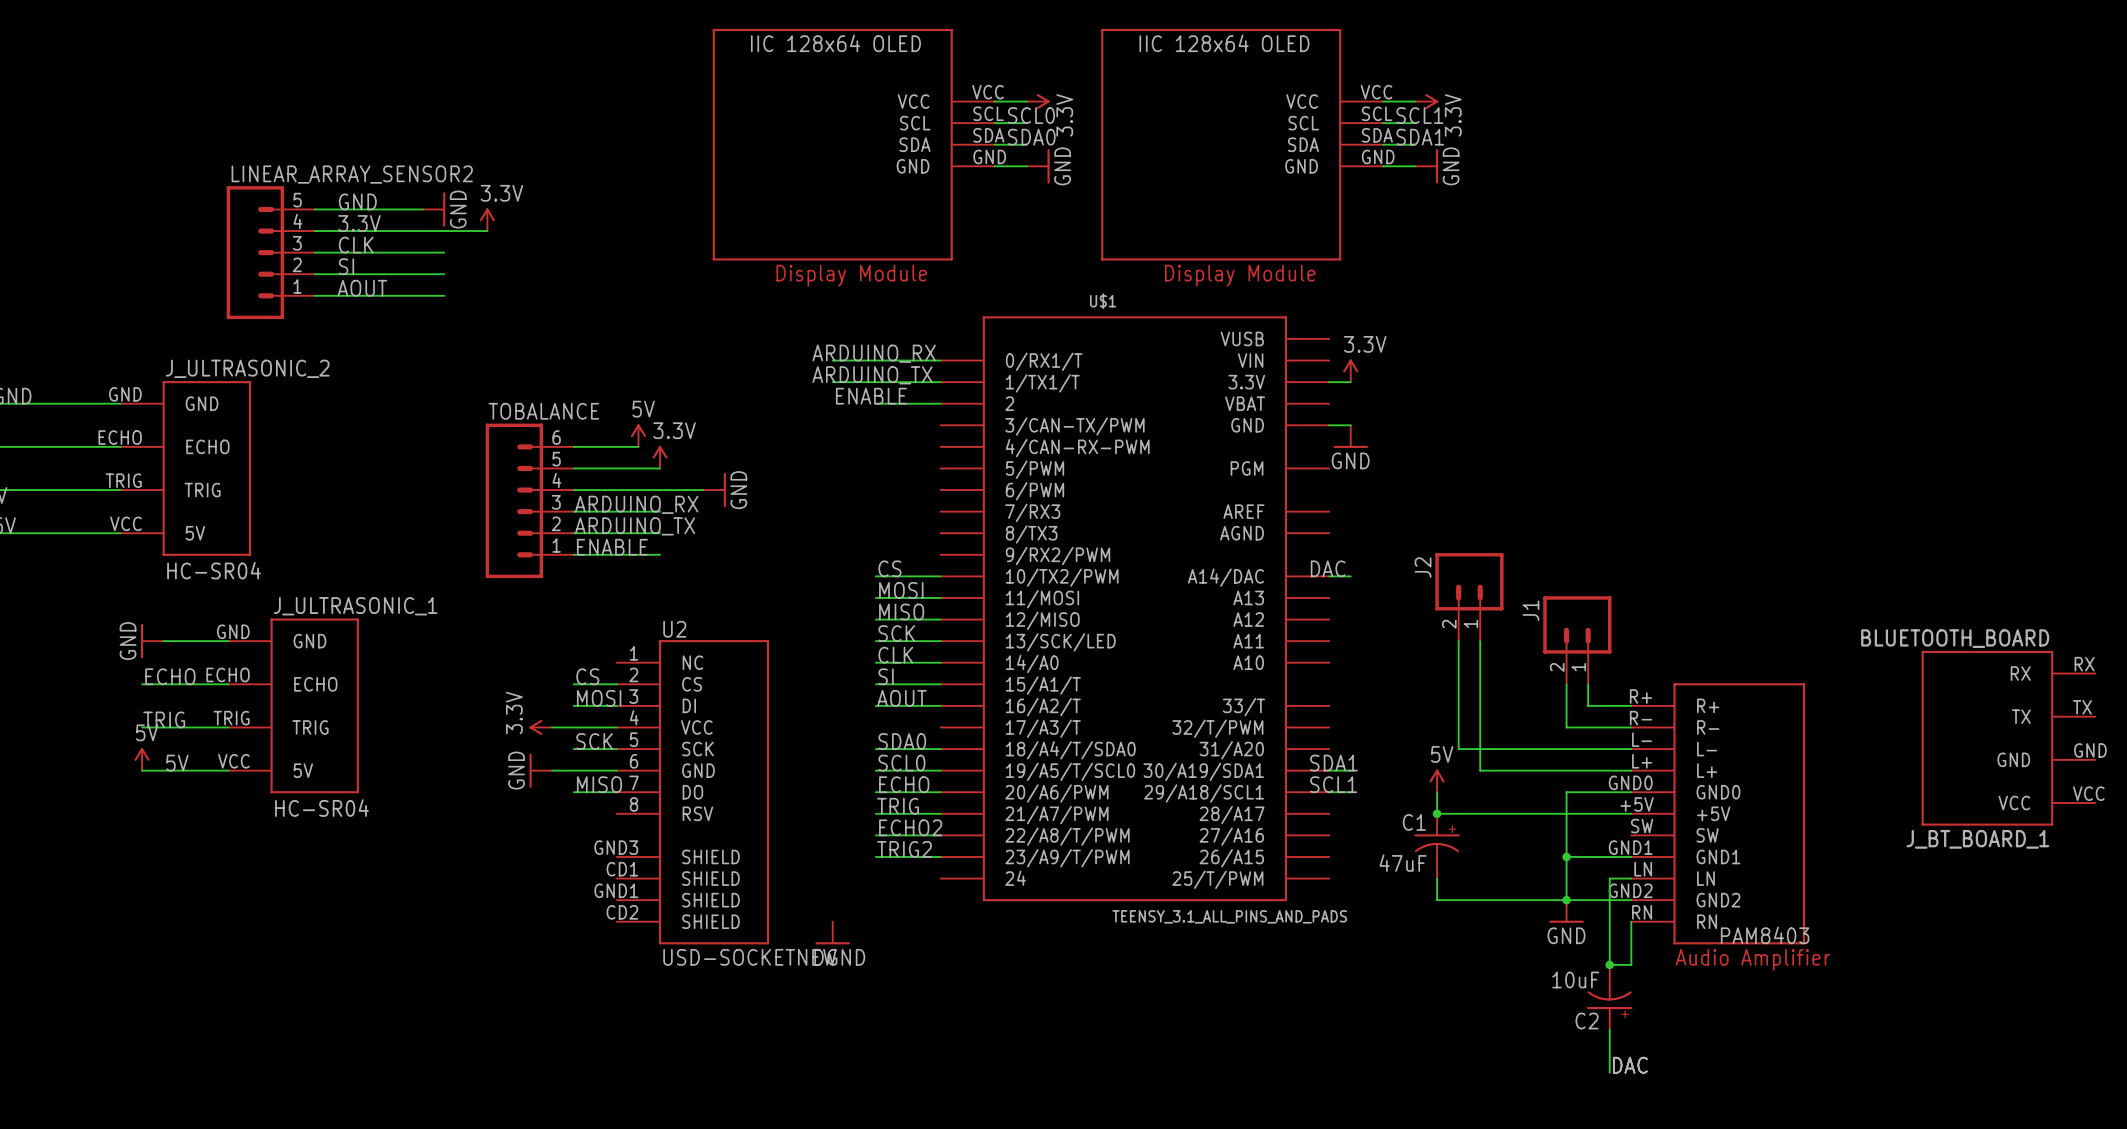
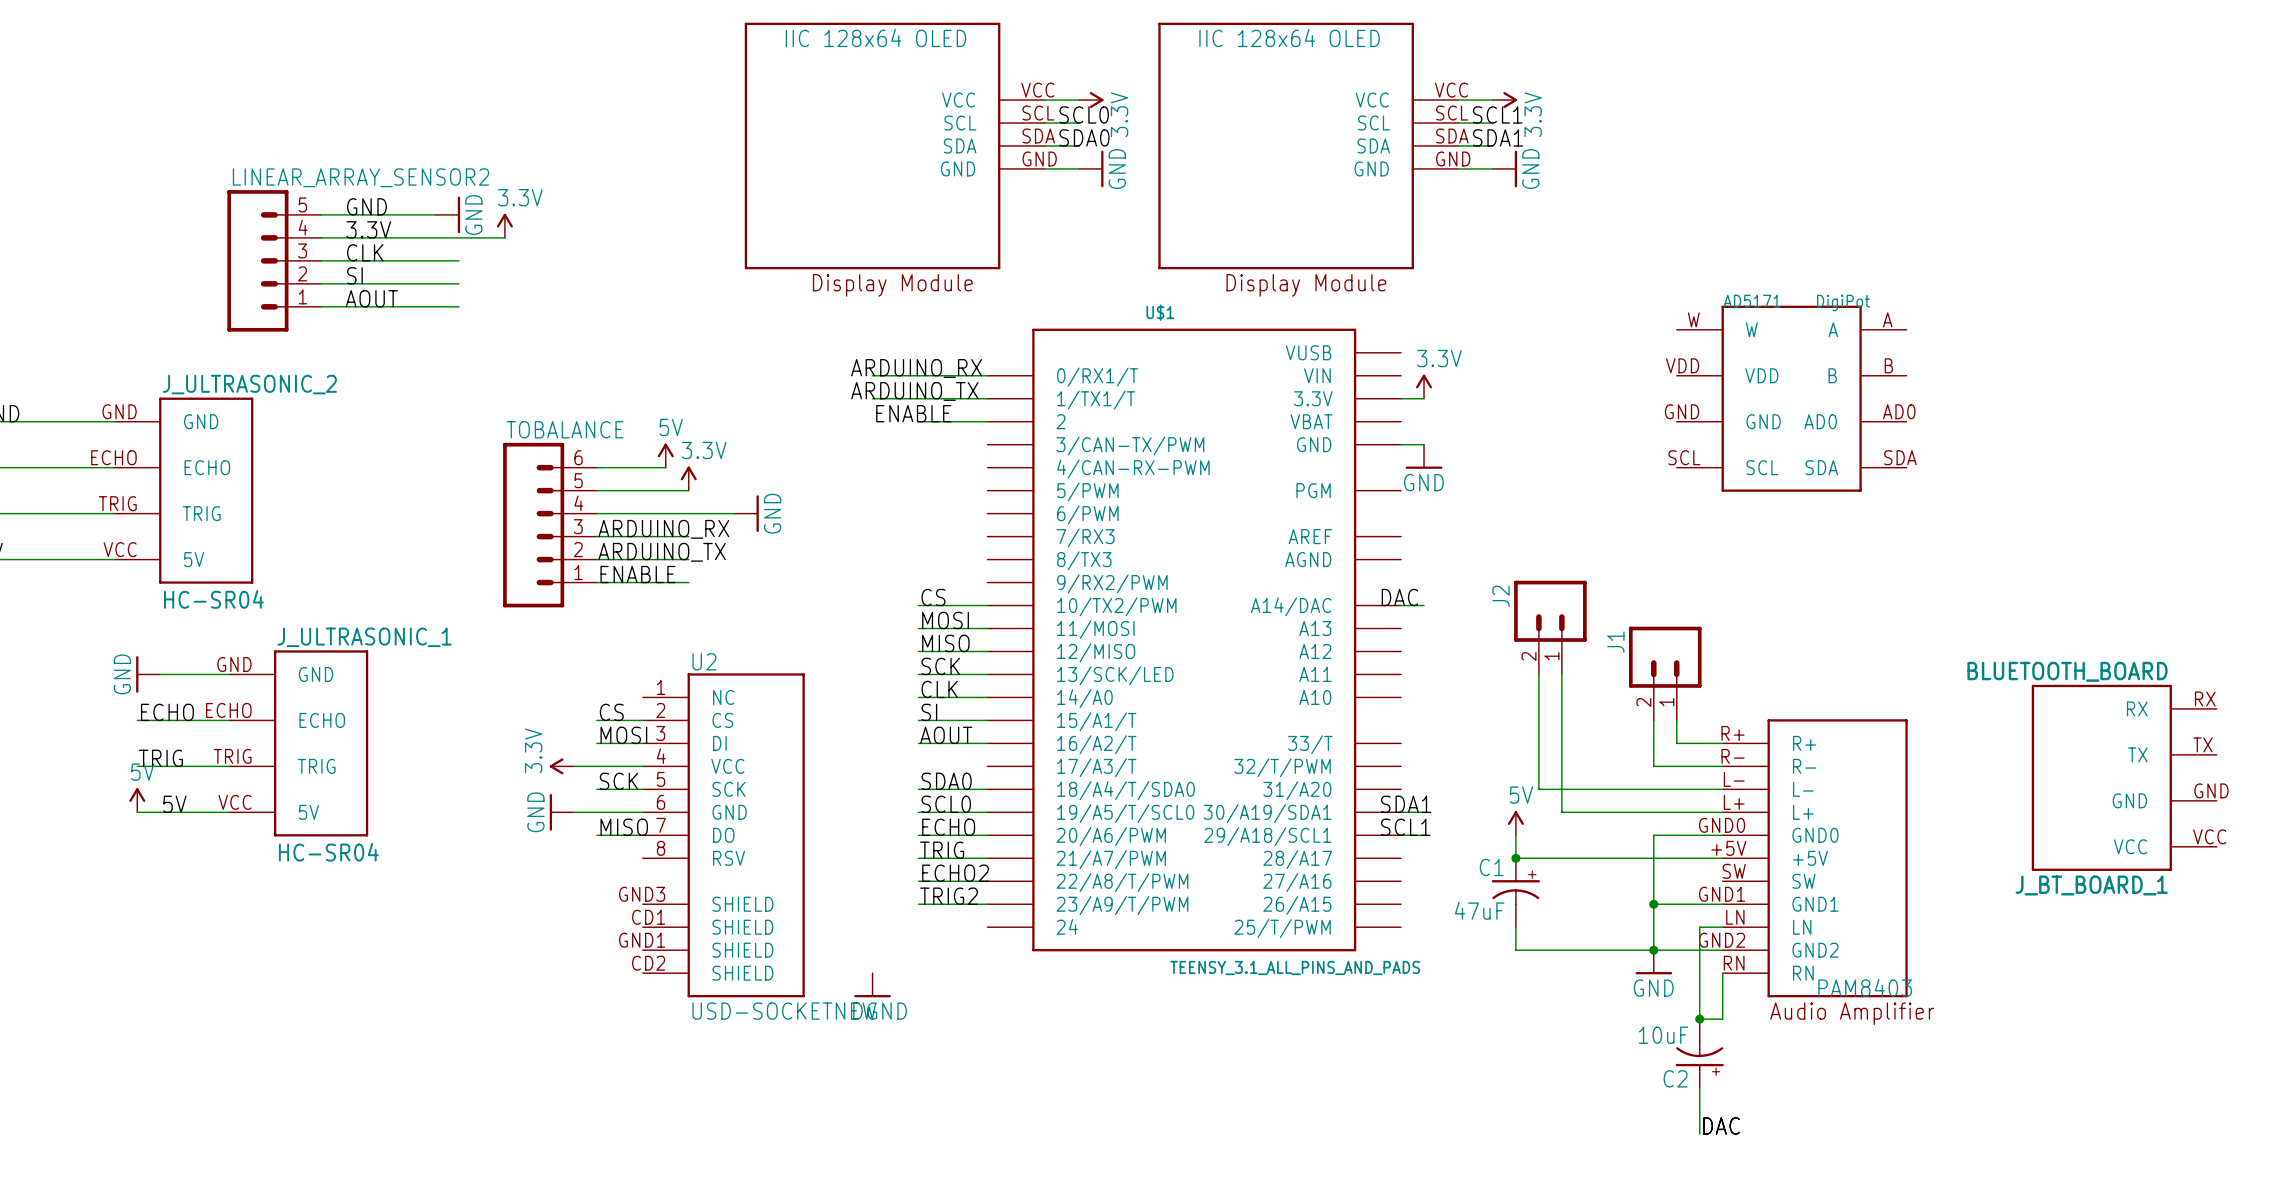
part: none -> (1791, 398)

